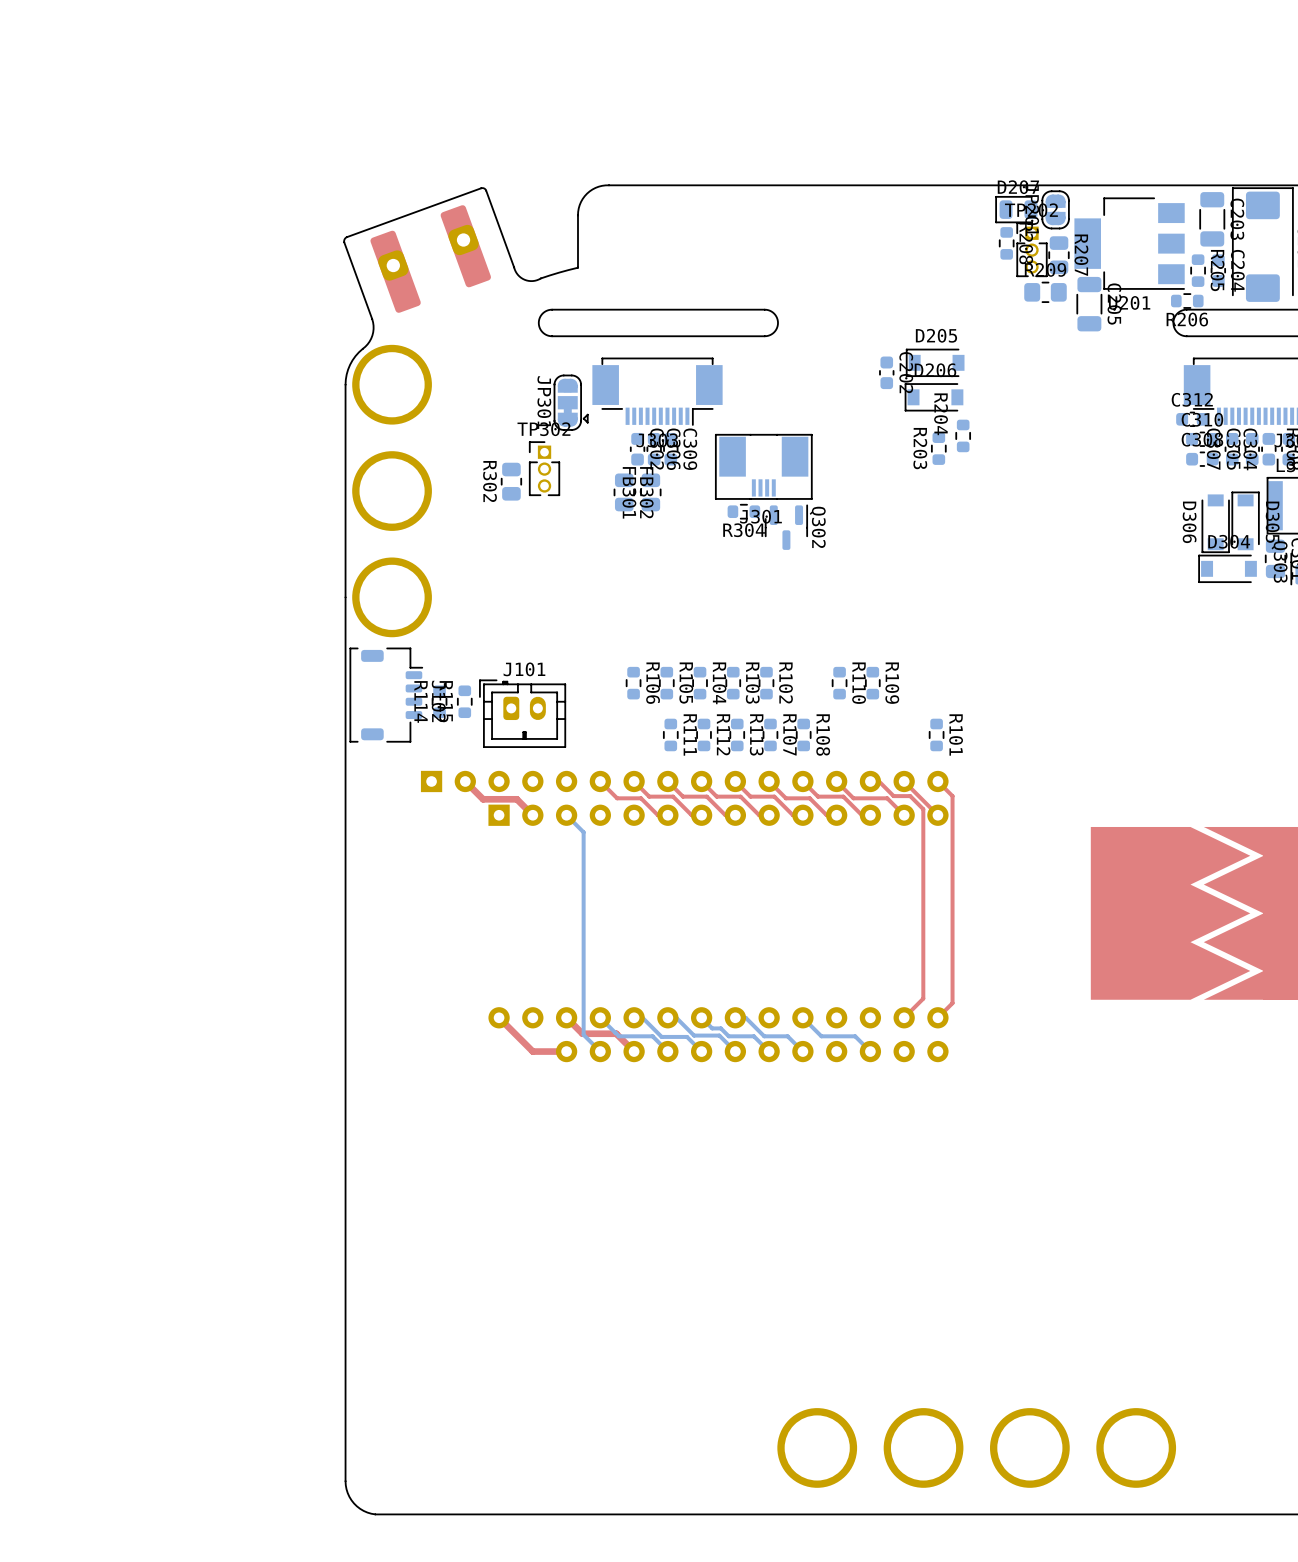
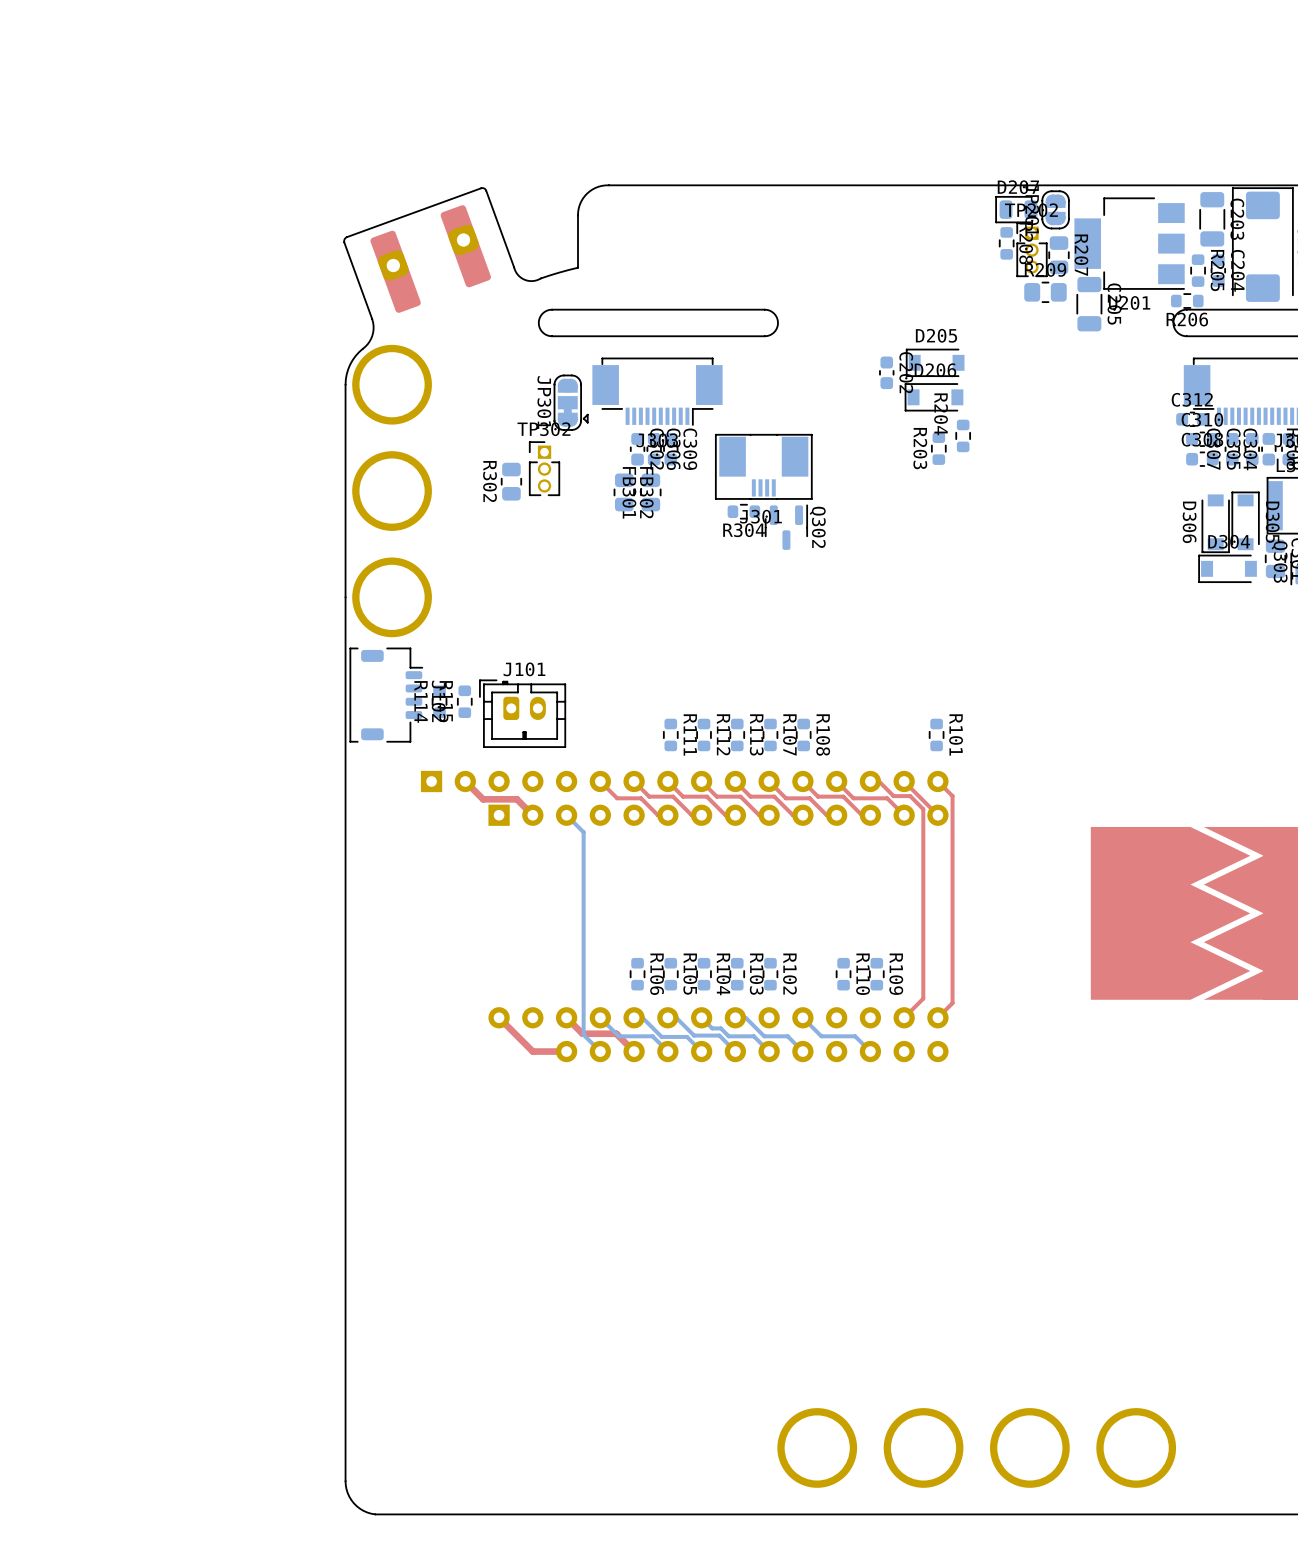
R106 position: (633, 683) -> (637, 974)
R105 position: (666, 683) -> (670, 974)
R104 position: (700, 683) -> (704, 974)
R103 position: (733, 683) -> (737, 974)
R102 position: (766, 683) -> (770, 974)
R110 position: (839, 683) -> (843, 974)
R109 position: (872, 683) -> (876, 974)

